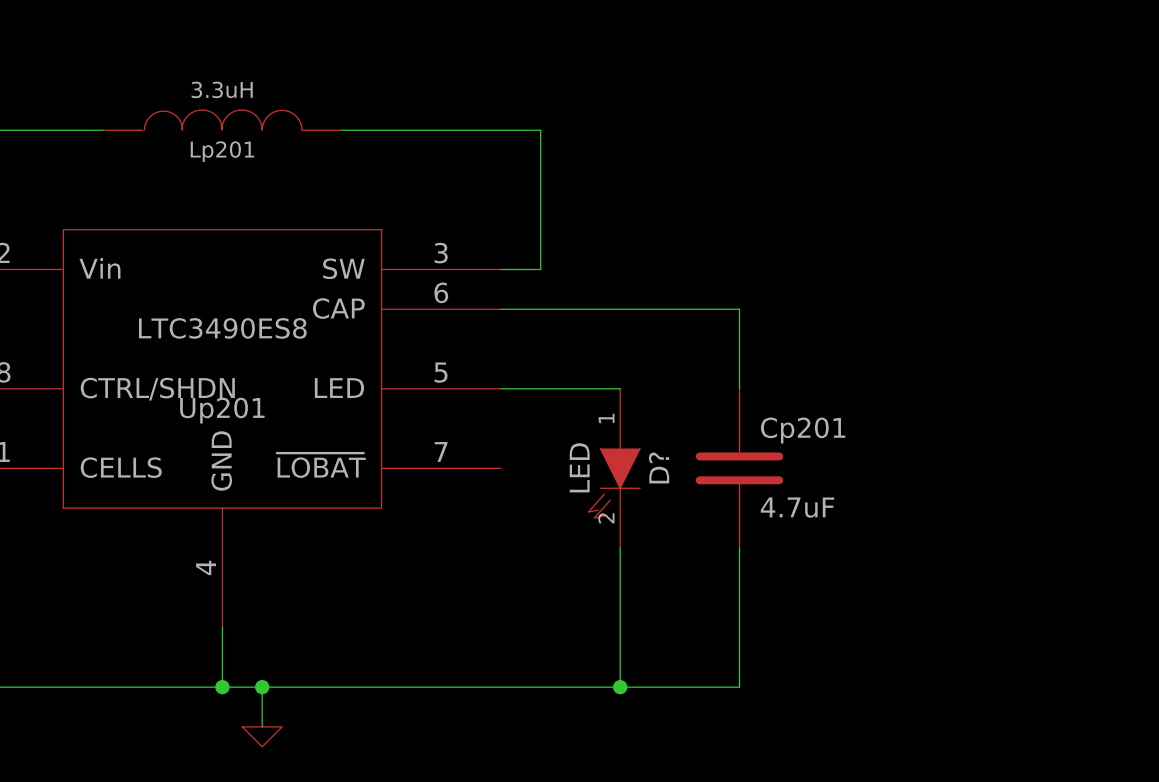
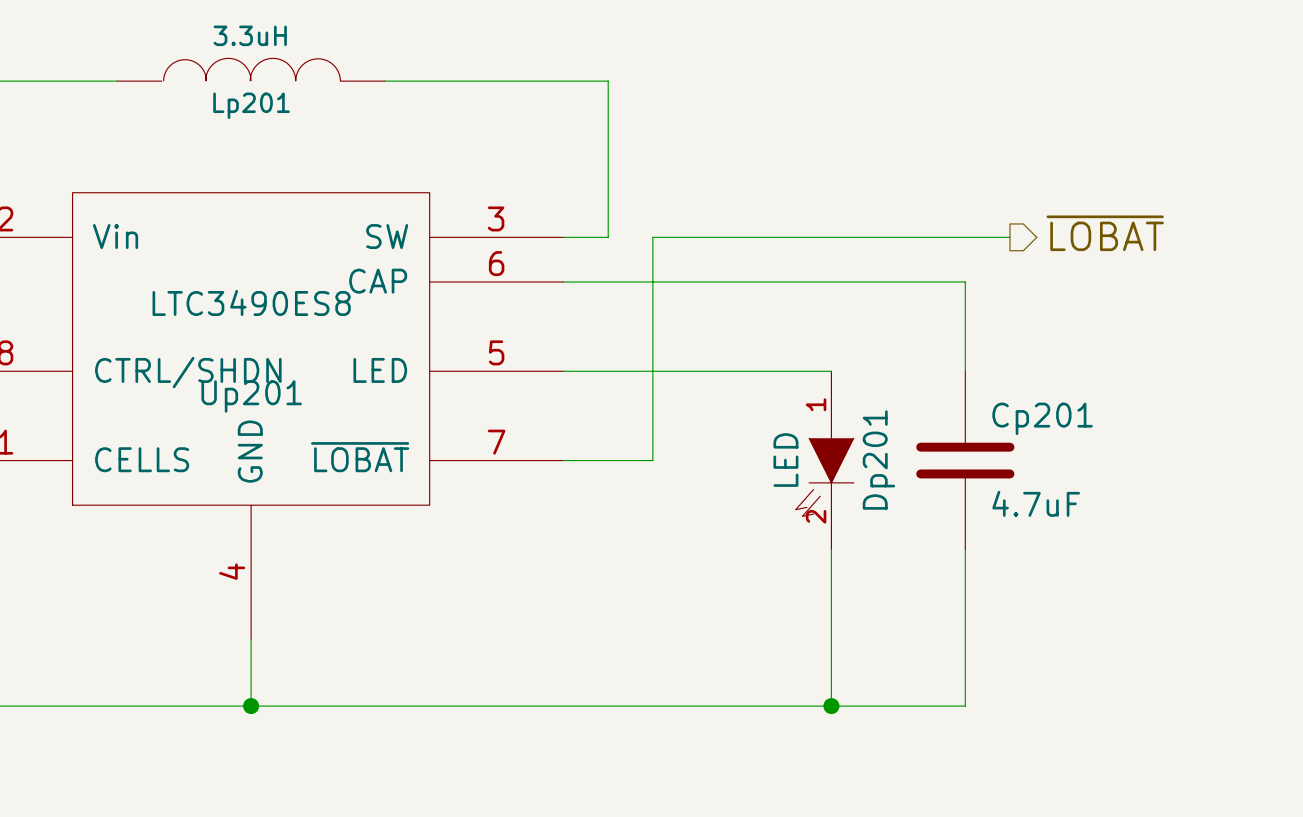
hierarchical label: none -> ~{LOBAT} (1105, 233)
wire: none -> (1009, 237) (652, 237) (652, 460) (563, 460)
wire: (739, 309) (739, 388) -> (831, 282) (965, 282) (965, 371)
wire: none -> (697, 371) (831, 371)
D?: LED (614, 468) -> none
Dp201: none -> LED (824, 460)
Cp201 position: (739, 468) -> (965, 460)
wire: (620, 547) (620, 687) -> none
wire: none -> (965, 549) (965, 706) (831, 706)
wire: (262, 687) (262, 726) -> none
junction: (262, 687) -> none
junction: (620, 687) -> none
junction: none -> (831, 706)
power symbol: (262, 736) -> none

